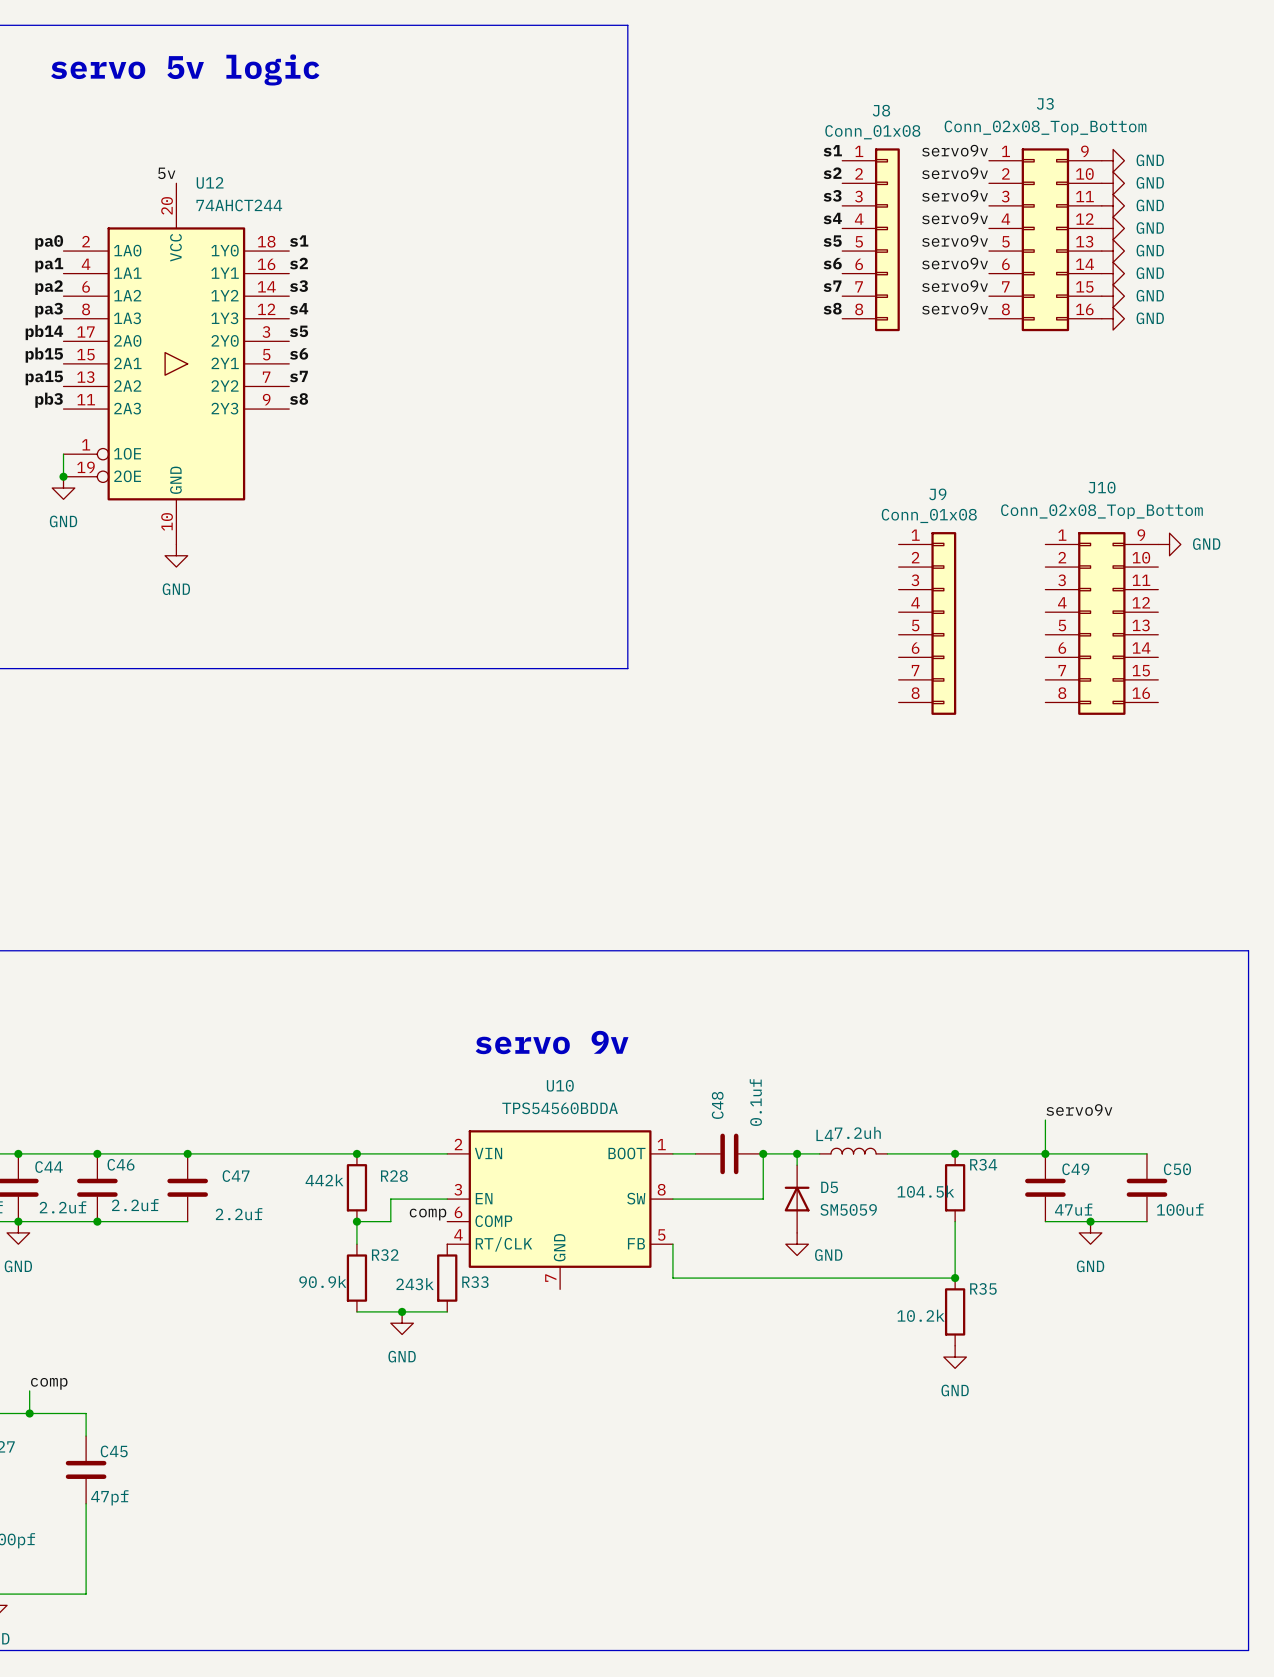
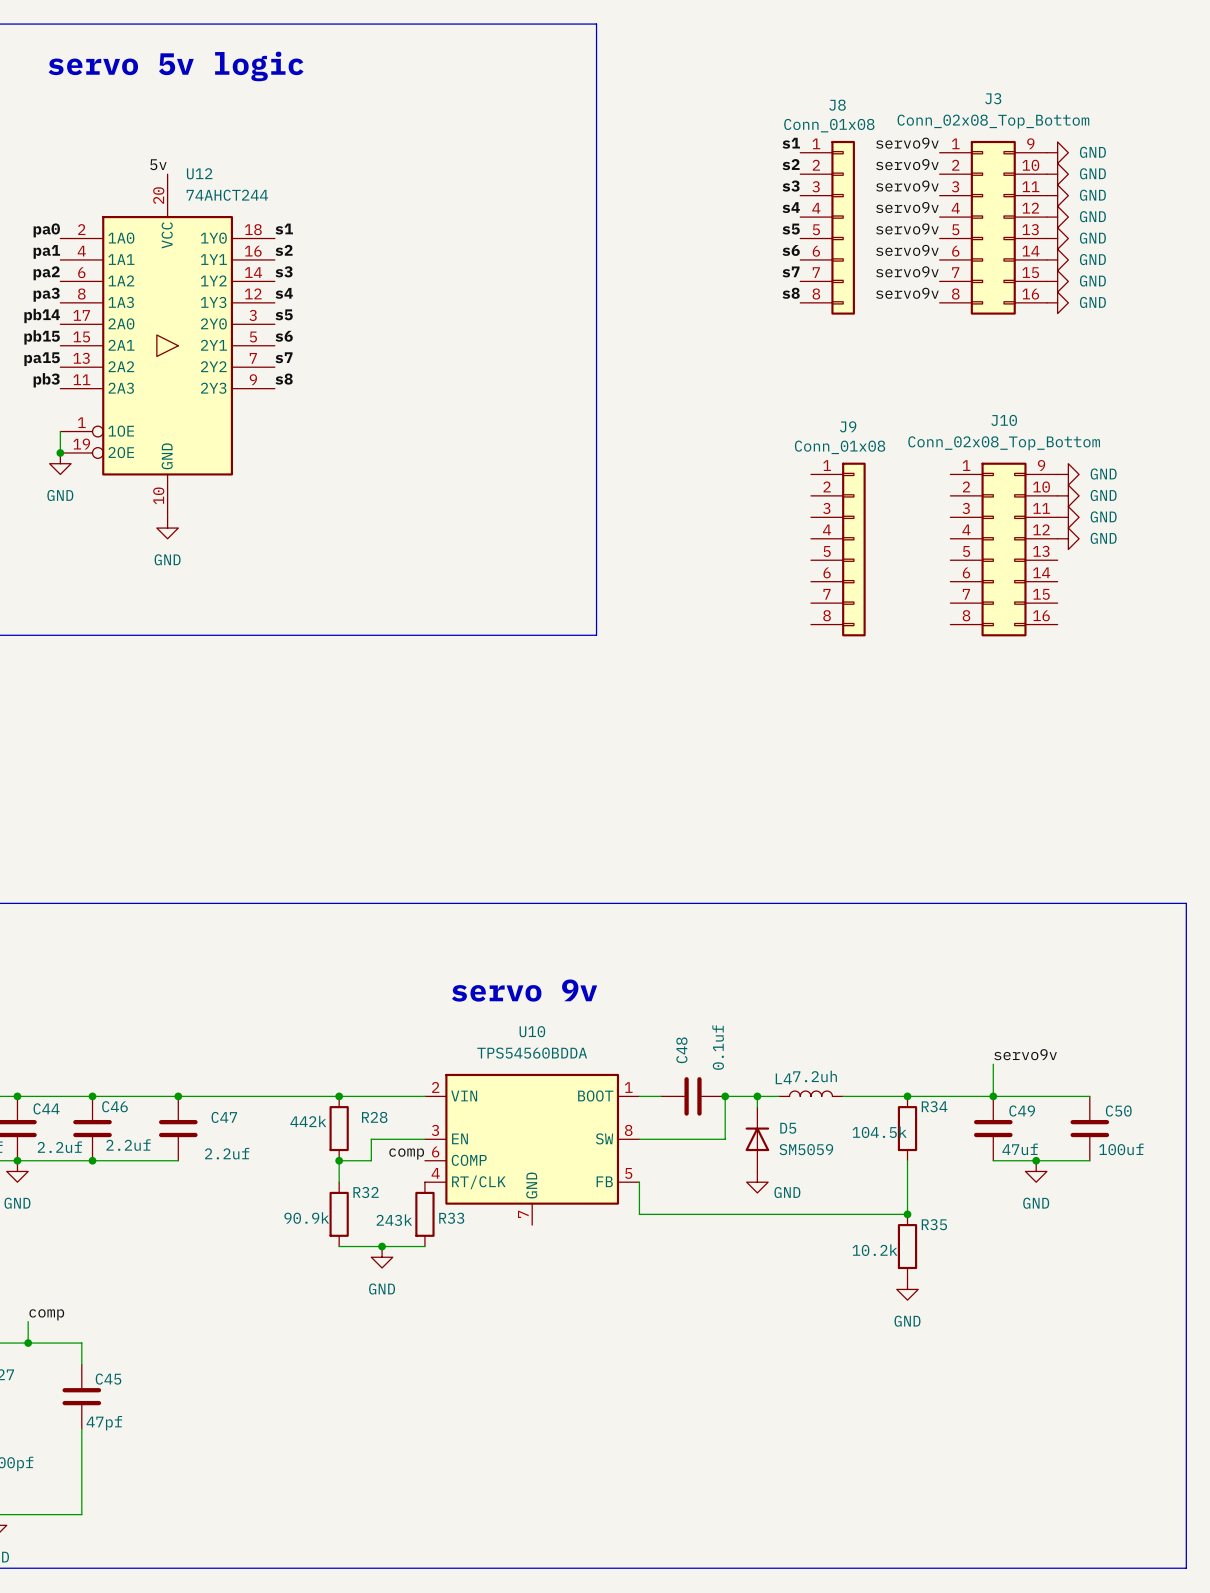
power symbol: none -> GND (1068, 474)
power symbol: none -> GND (1068, 495)
power symbol: none -> GND (1068, 517)
power symbol: GND (1169, 544) -> none
power symbol: none -> GND (1068, 538)
J9 position: (927, 623) -> (838, 549)
J10 position: (1101, 623) -> (1004, 549)

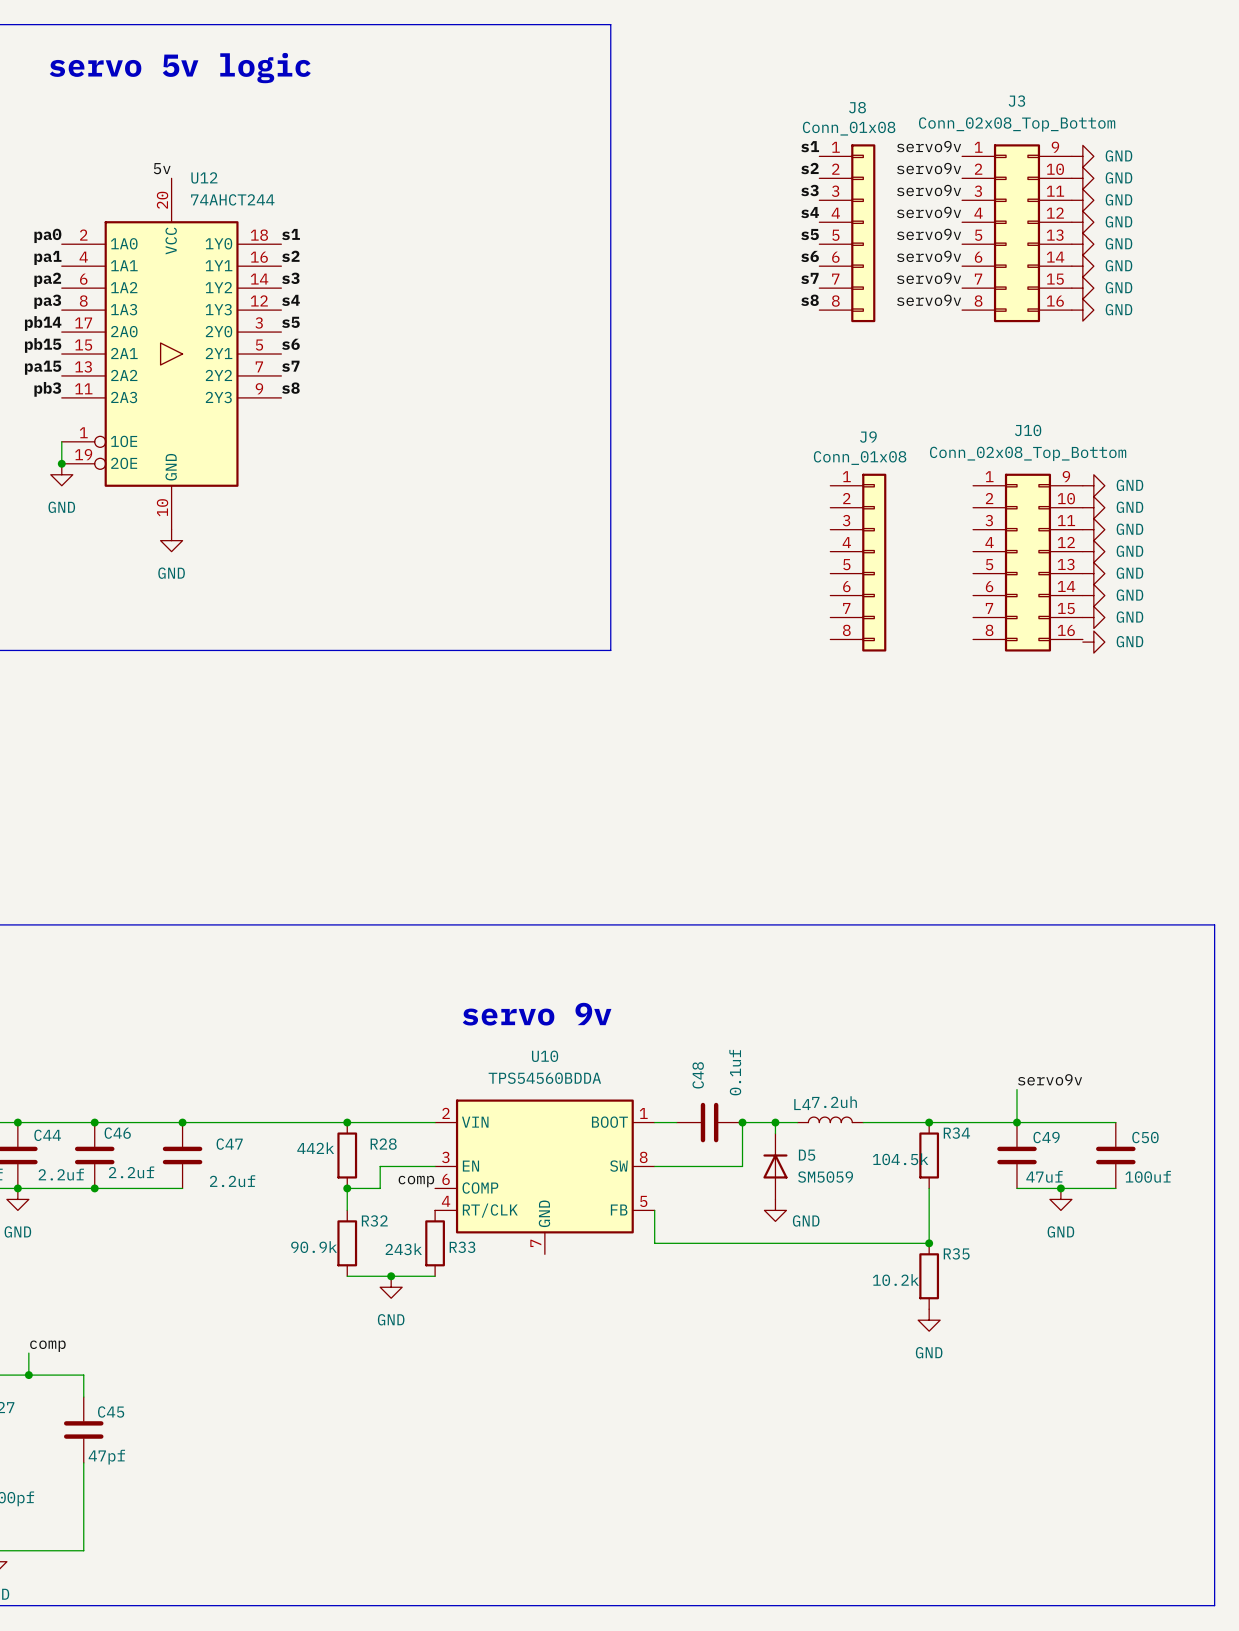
power symbol: none -> GND (1093, 573)
power symbol: none -> GND (1093, 595)
power symbol: none -> GND (1093, 617)
power symbol: none -> GND (1093, 642)

